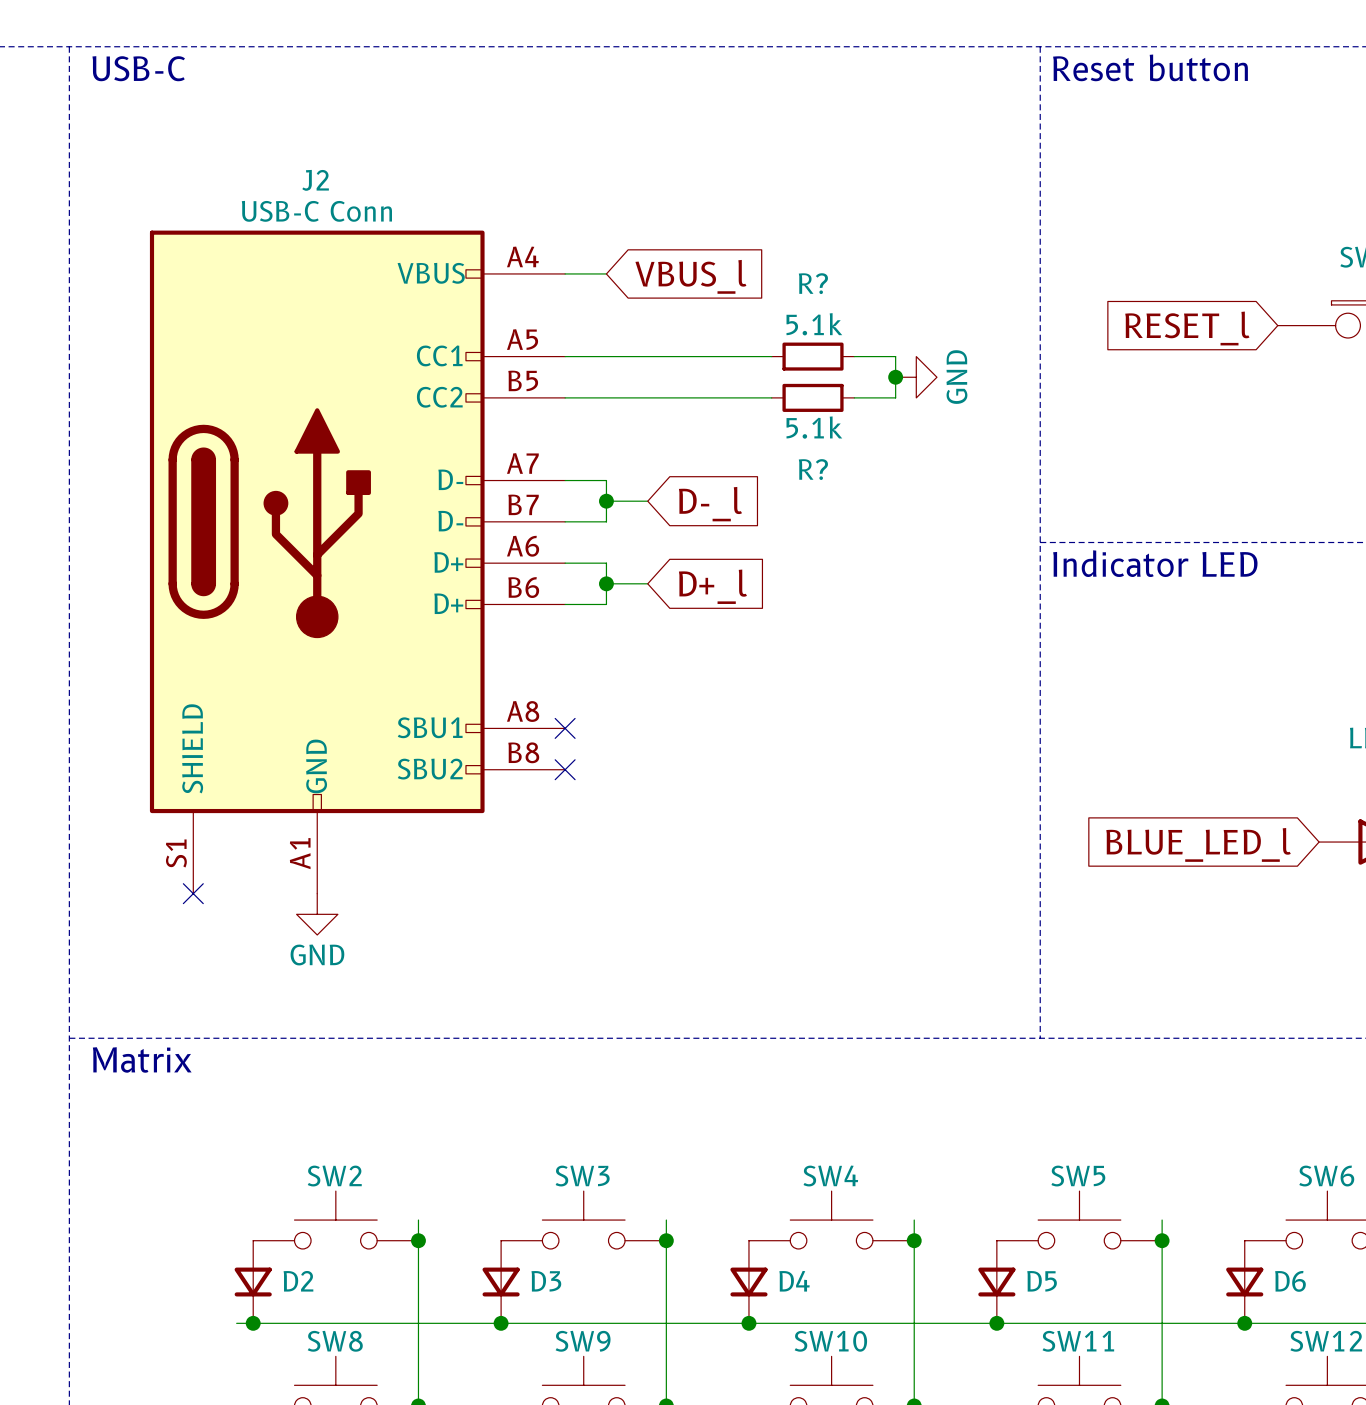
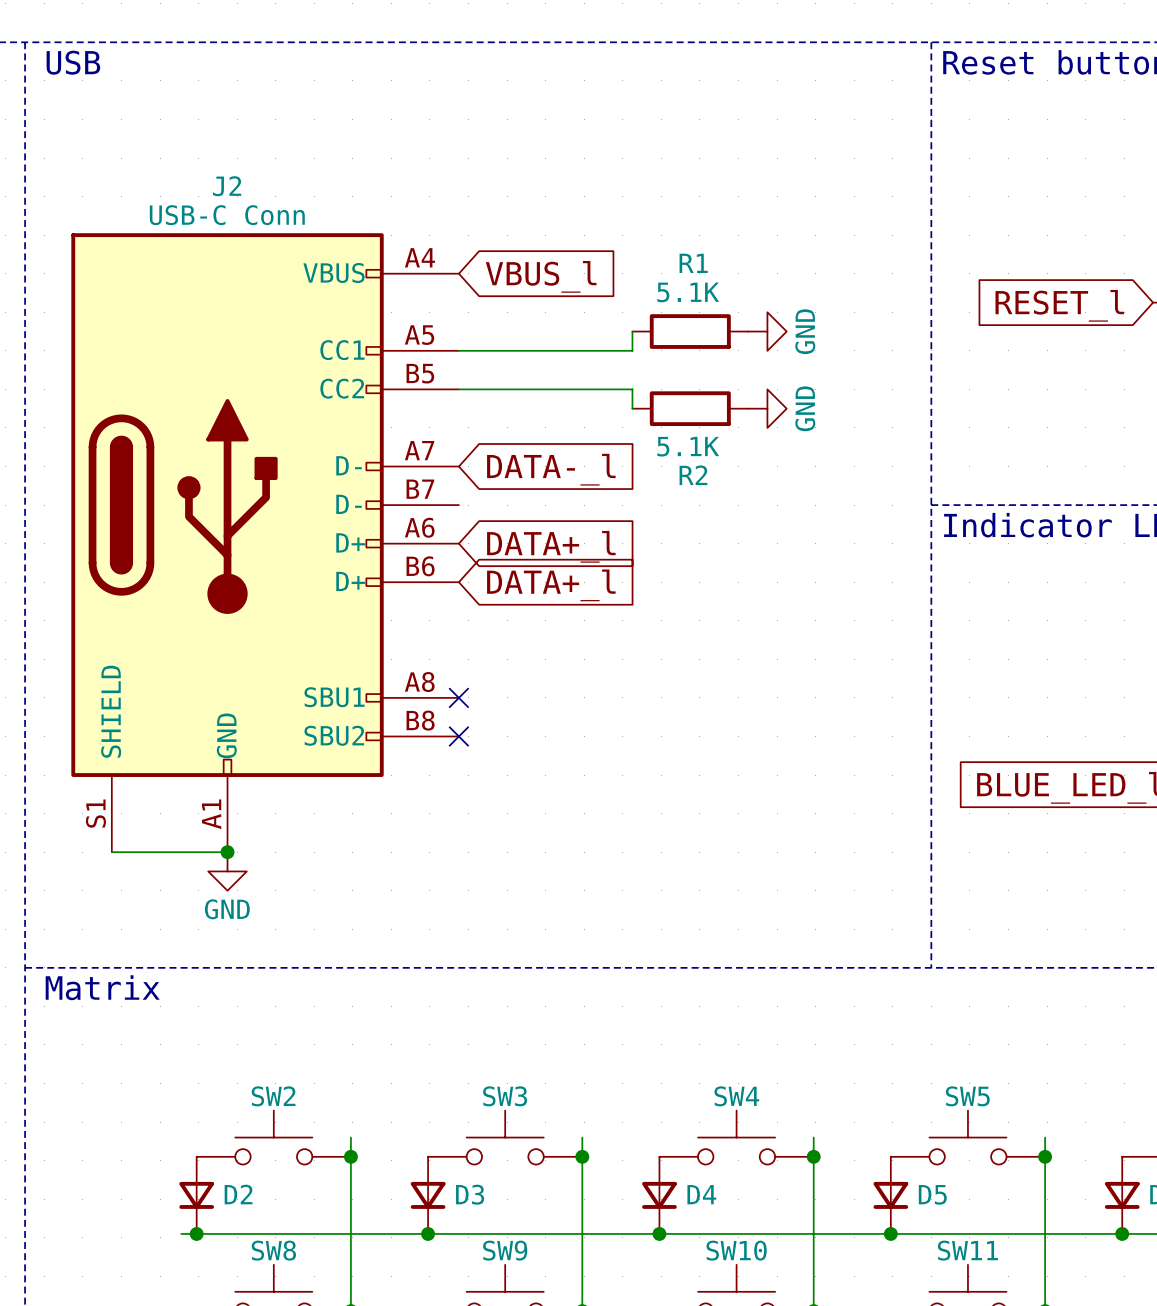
text: USB-C (138, 68) -> USB (73, 62)
wire: (565, 273) (606, 273) -> none
global label position: VBUS_l (690, 276) -> VBUS_l (541, 276)
wire: (565, 356) (771, 356) -> none
wire: none -> (632, 331) (632, 350) (458, 350)
R1: none -> 5.1K (690, 331)
R?: 5.1k (813, 356) -> none
wire: (854, 356) (895, 356) (895, 397) (854, 397) -> none
power symbol: none -> GND (767, 331)
junction: (895, 377) -> none
power symbol: GND (916, 377) -> none
wire: (565, 397) (771, 397) -> none
R?: 5.1k (813, 397) -> none
wire: none -> (458, 389) (632, 389) (632, 408)
R2: none -> 5.1K (690, 408)
power symbol: none -> GND (767, 408)
wire: (565, 480) (606, 480) (606, 521) (565, 521) -> none
wire: (606, 501) (647, 501) -> none
junction: (606, 501) -> none
global label: D-_l (710, 504) -> DATA-_l (551, 469)
J2 position: (357, 562) -> (265, 542)
wire: (565, 563) (606, 563) (606, 604) (565, 604) -> none
wire: (606, 583) (647, 583) -> none
junction: (606, 583) -> none
global label: none -> DATA+_l (551, 546)
global label: D+_l (712, 586) -> none
global label: none -> DATA+_l (551, 585)
no-connect mark: (565, 728) -> none
no-connect mark: none -> (458, 697)
no-connect mark: (565, 769) -> none
no-connect mark: none -> (458, 736)
no-connect mark: (193, 893) -> none
wire: none -> (111, 852) (227, 852)
junction: none -> (227, 852)
power symbol position: GND (317, 914) -> GND (227, 871)

